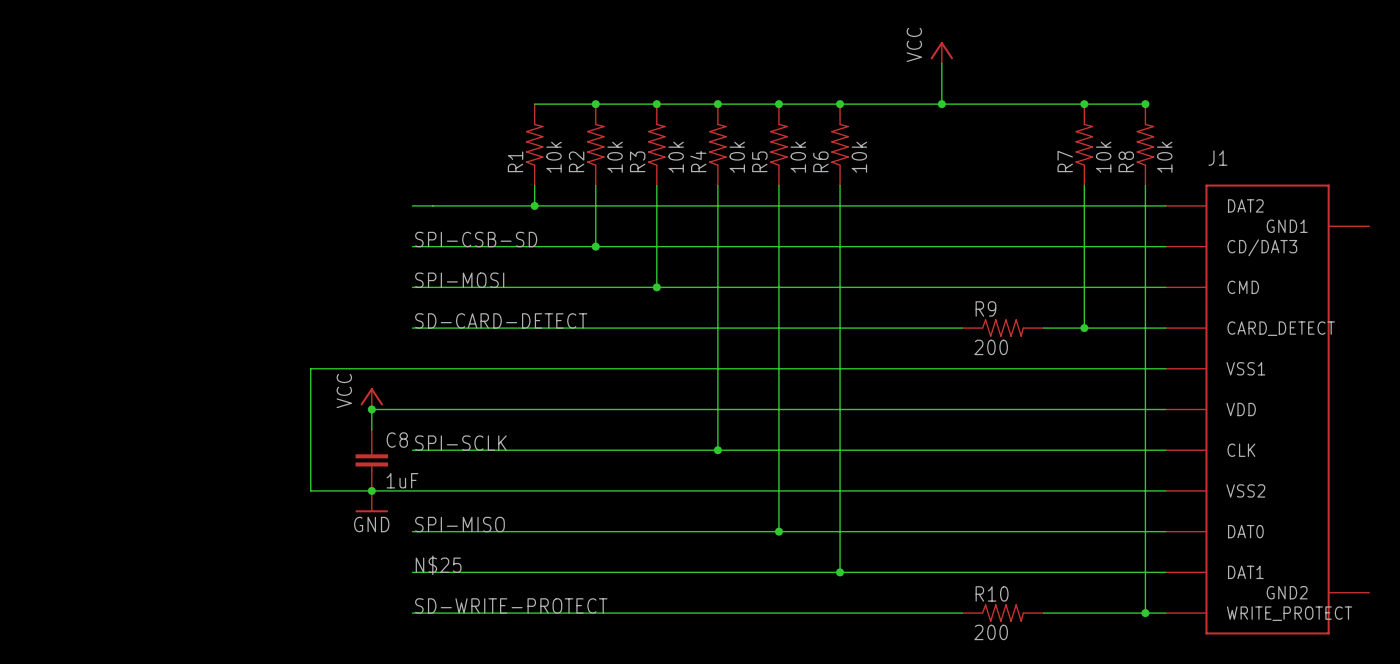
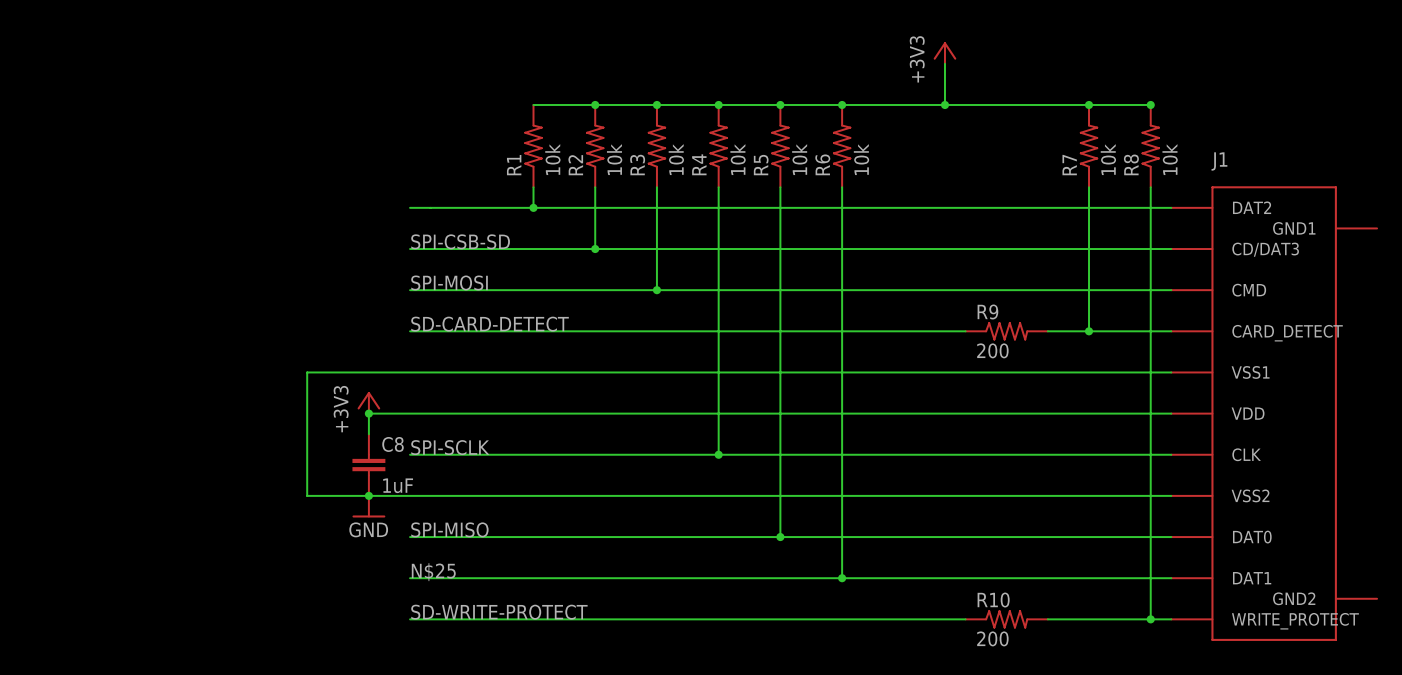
power symbol: VCC (941, 52) -> +3V3 (944, 53)
power symbol: VCC (371, 398) -> +3V3 (368, 402)

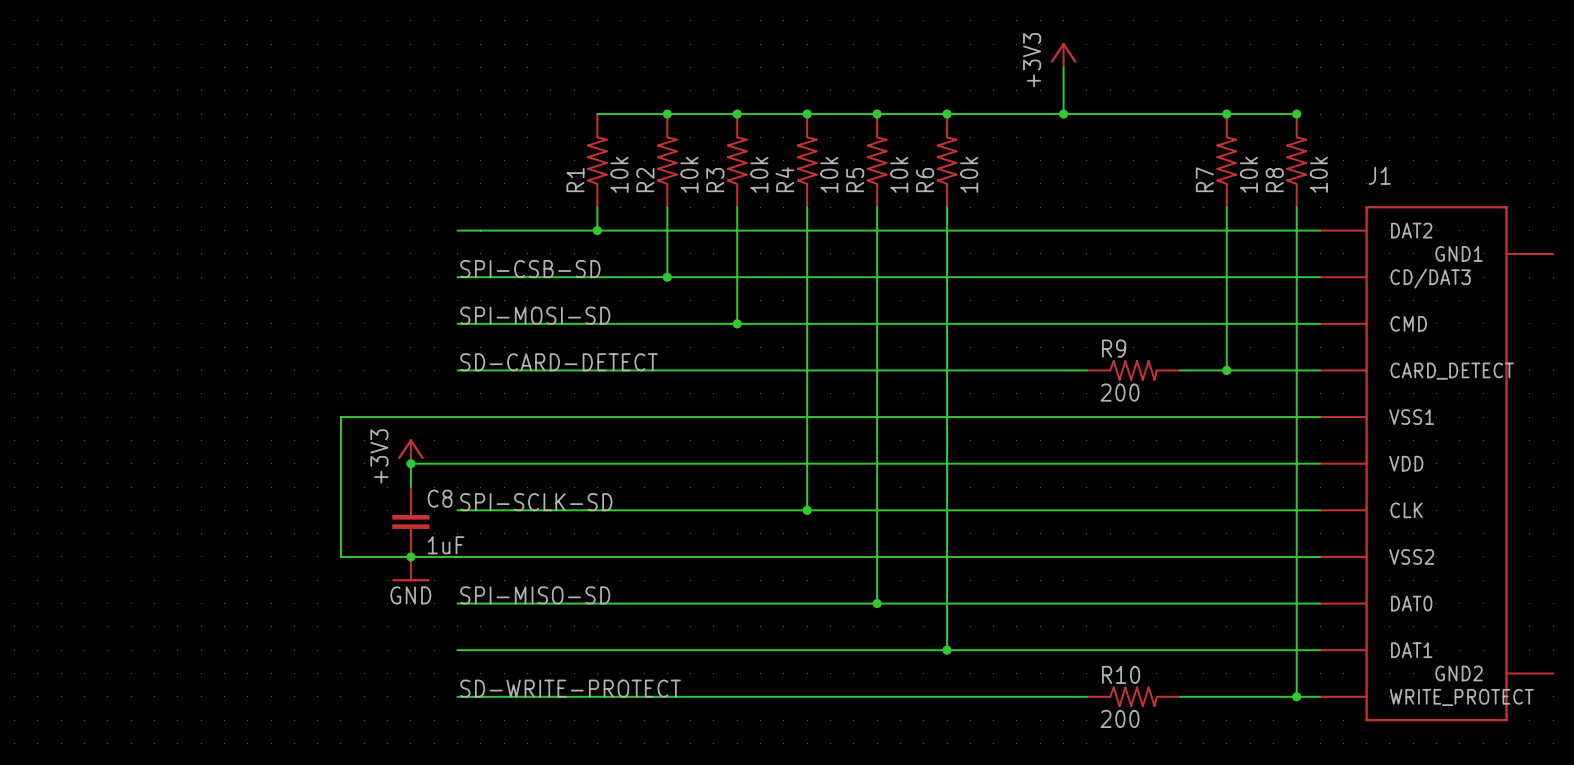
label: SPI-MOSI (449, 282) -> SPI-MOSI-SD (535, 315)
label: SPI-SCLK (450, 447) -> SPI-SCLK-SD (536, 502)
label: SPI-MISO (449, 529) -> SPI-MISO-SD (535, 595)
label: N$25 (433, 572) -> none

